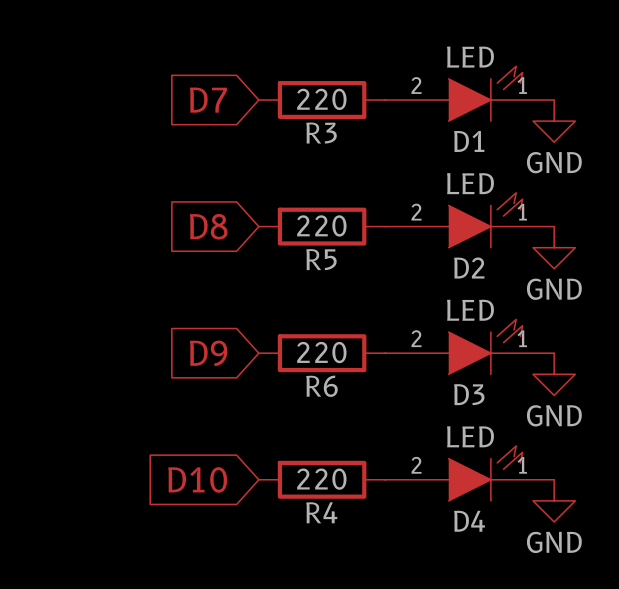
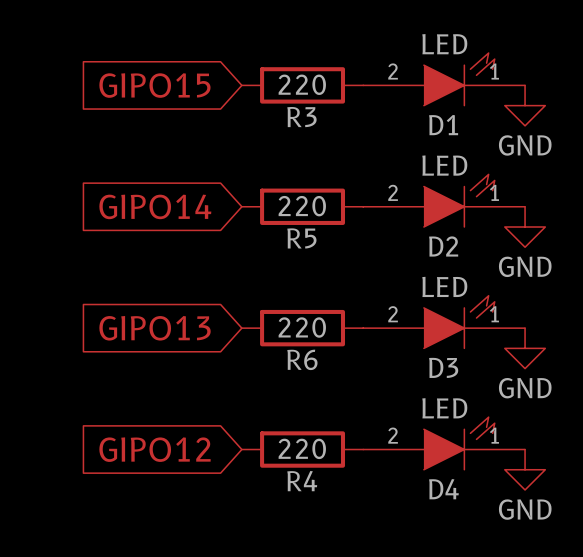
global label: D7 (208, 100) -> GIPO15 (154, 85)
global label: D8 (208, 226) -> GIPO14 (155, 206)
global label: D9 (208, 353) -> GIPO13 (155, 328)
global label: D10 (197, 479) -> GIPO12 (155, 449)

